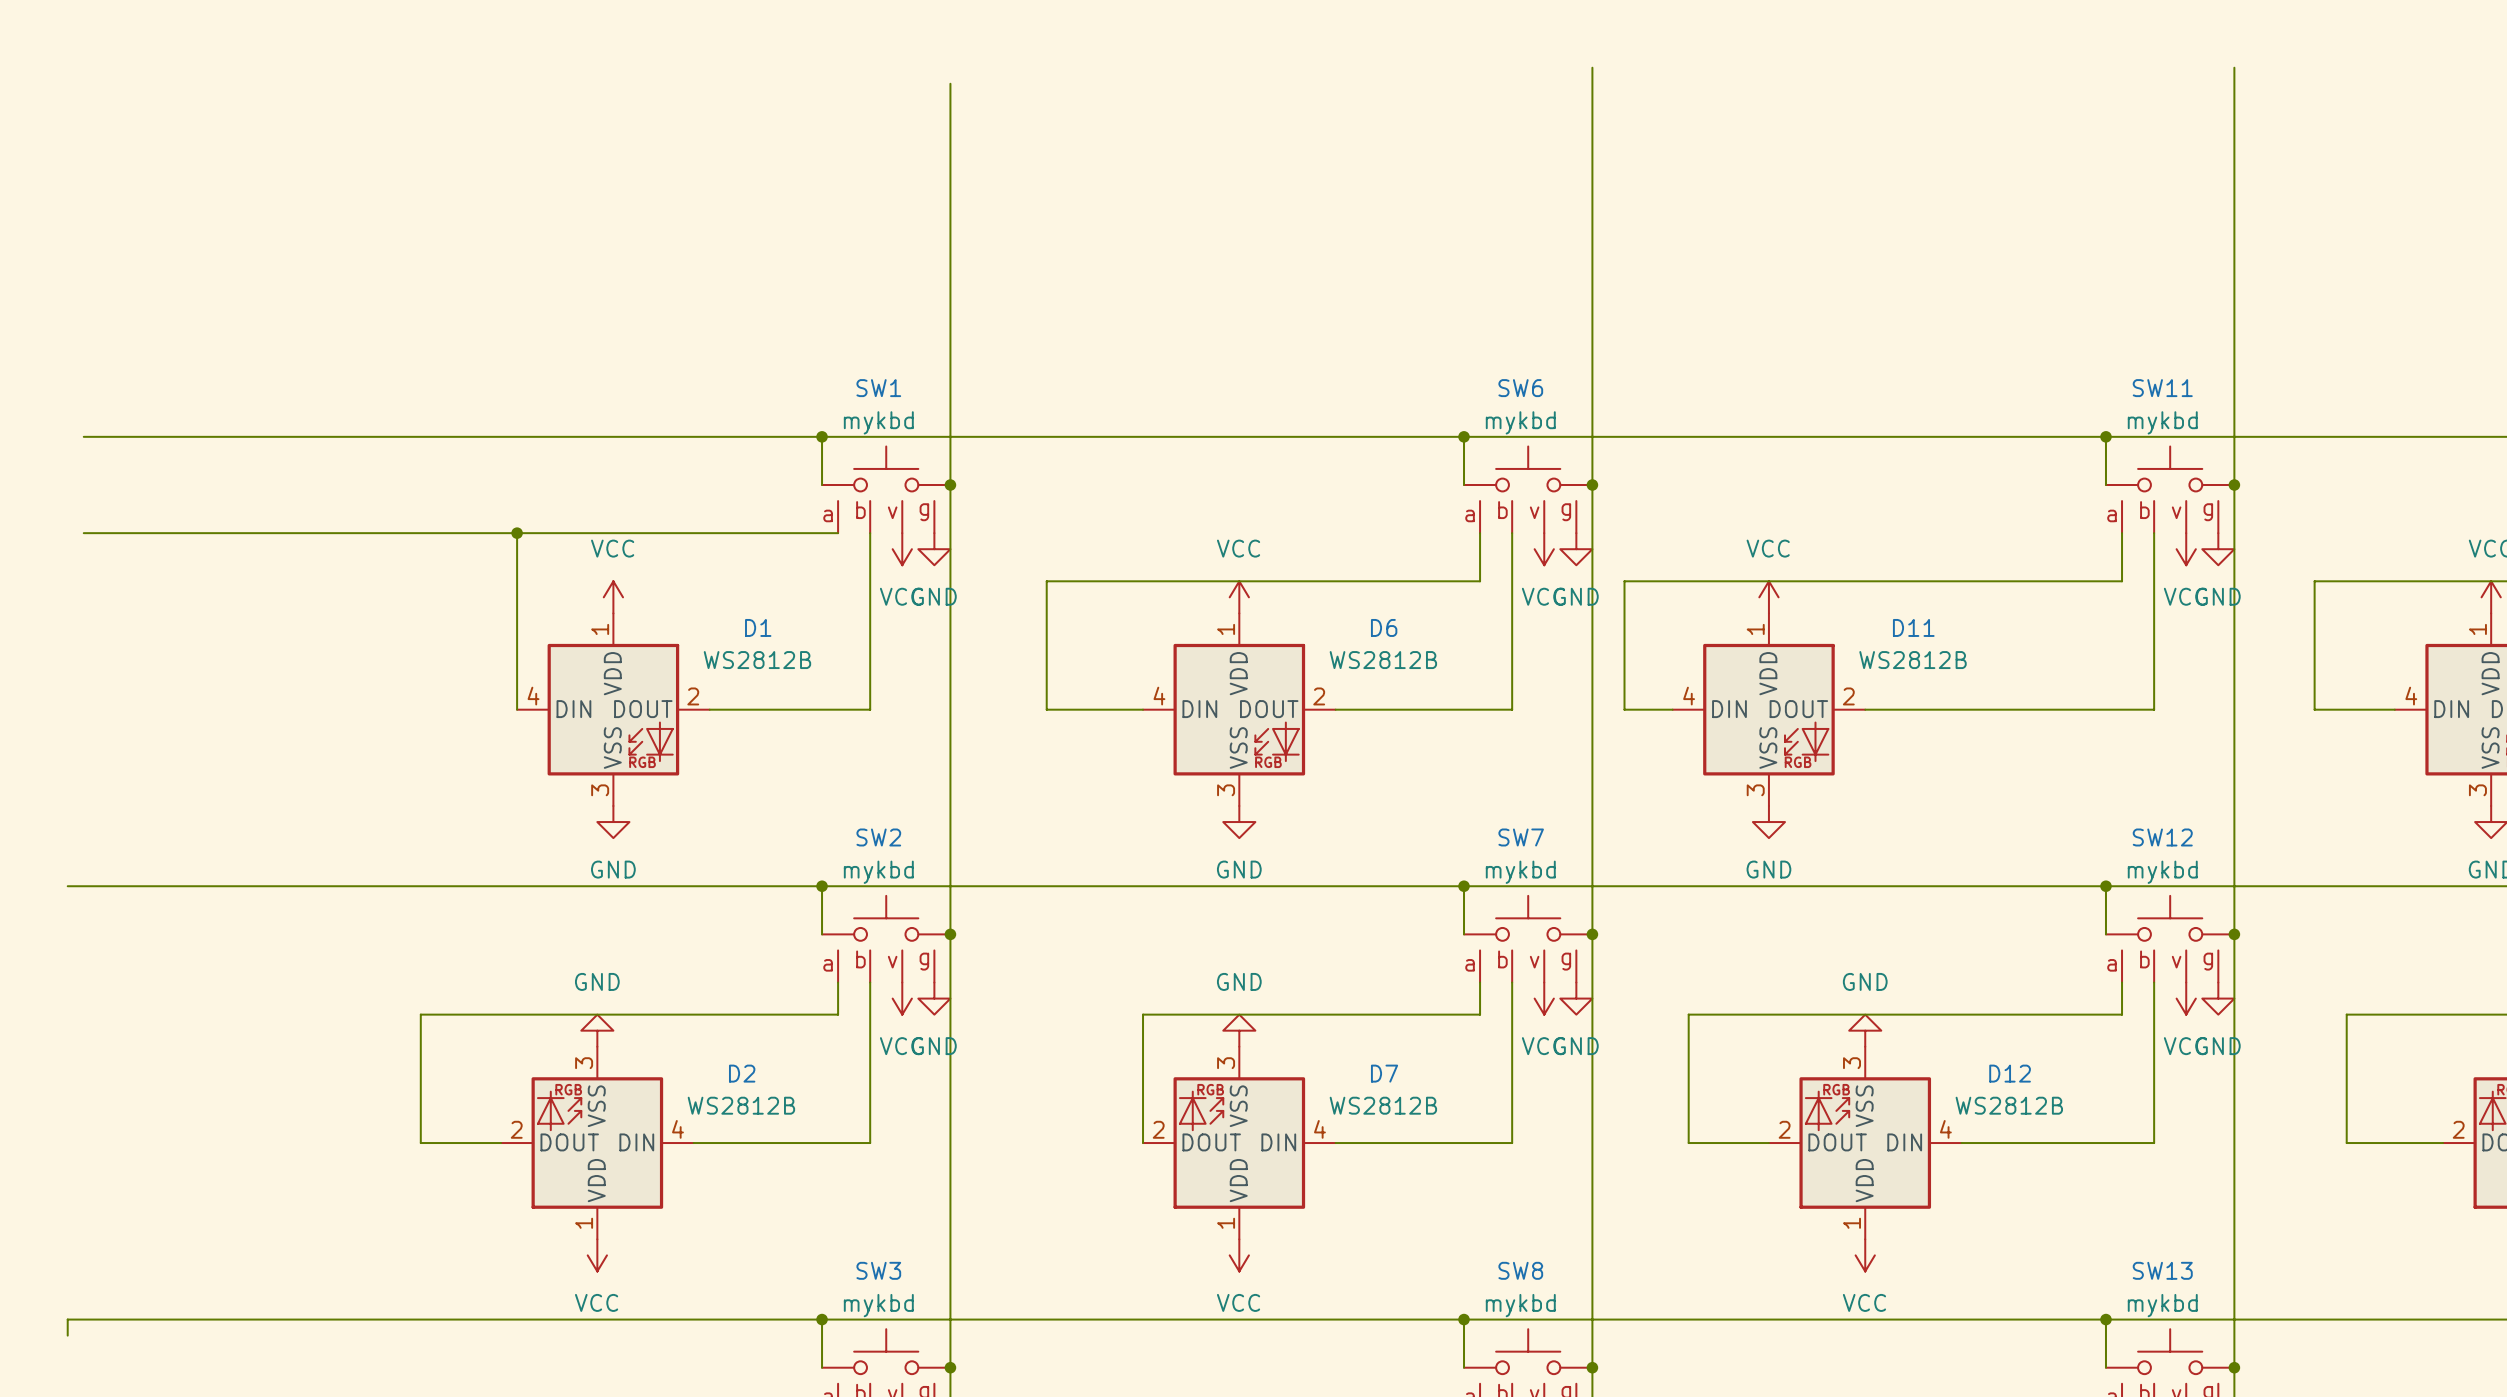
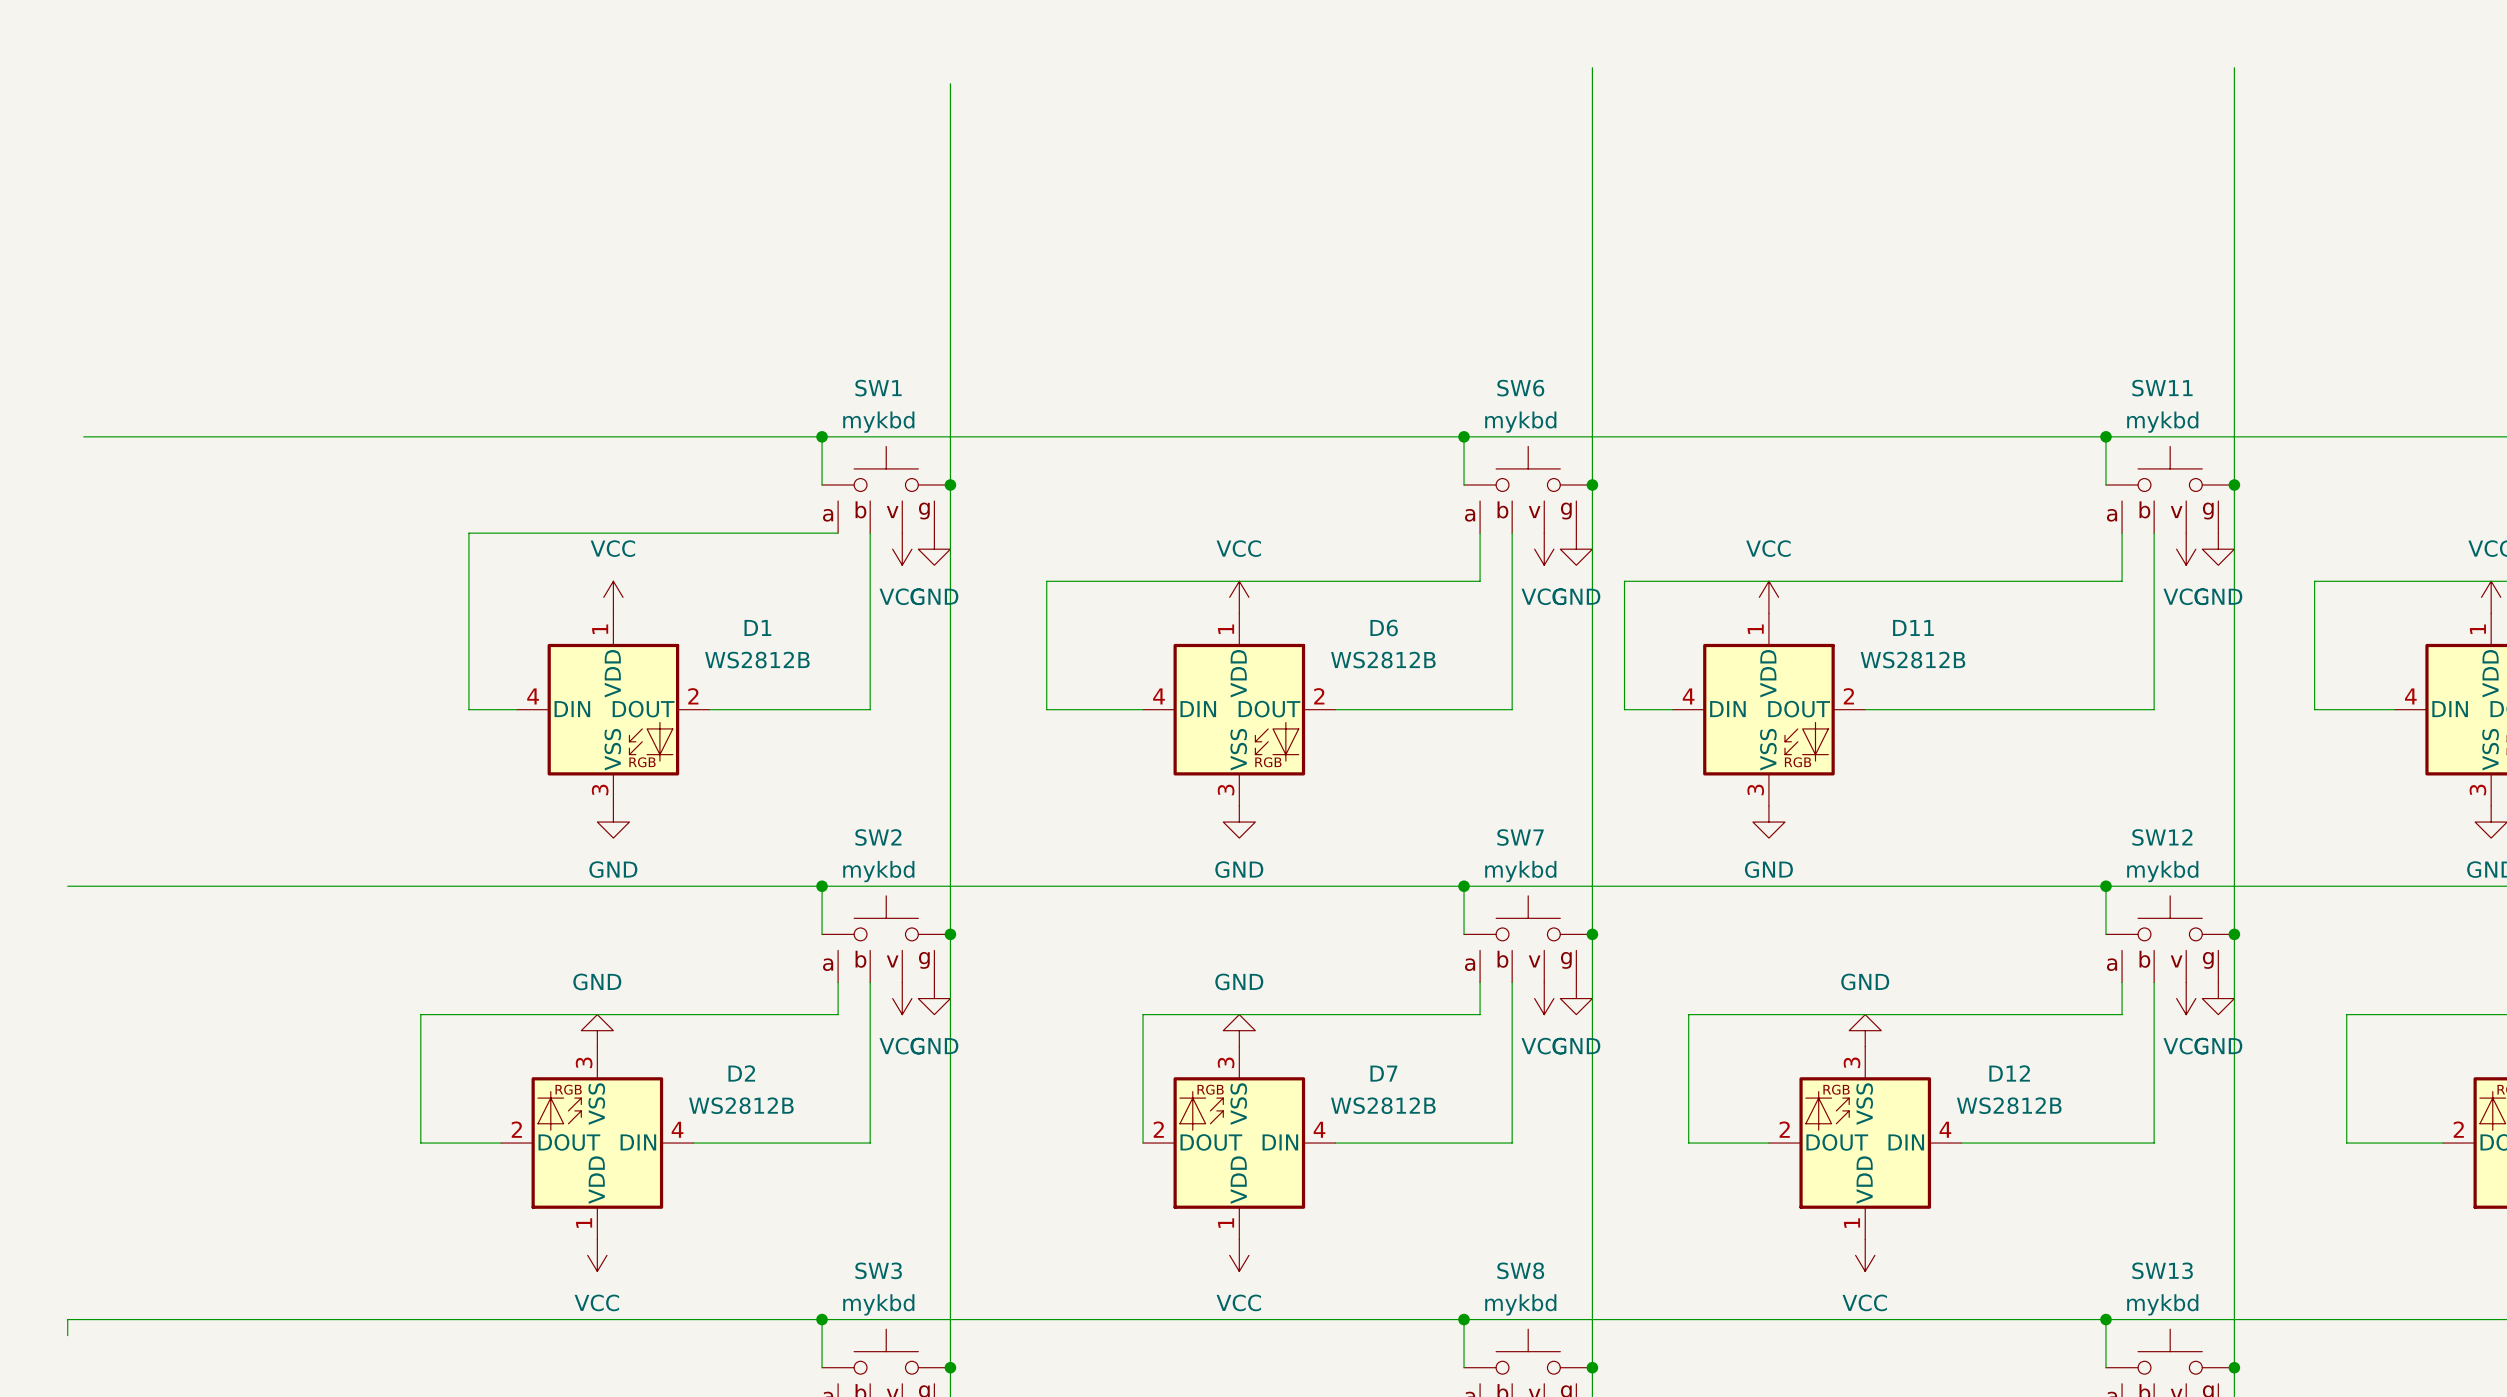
wire: (83, 533) (468, 533) -> none
wire: (517, 533) (517, 709) -> (468, 533) (468, 709) (517, 709)
junction: (517, 533) -> none

